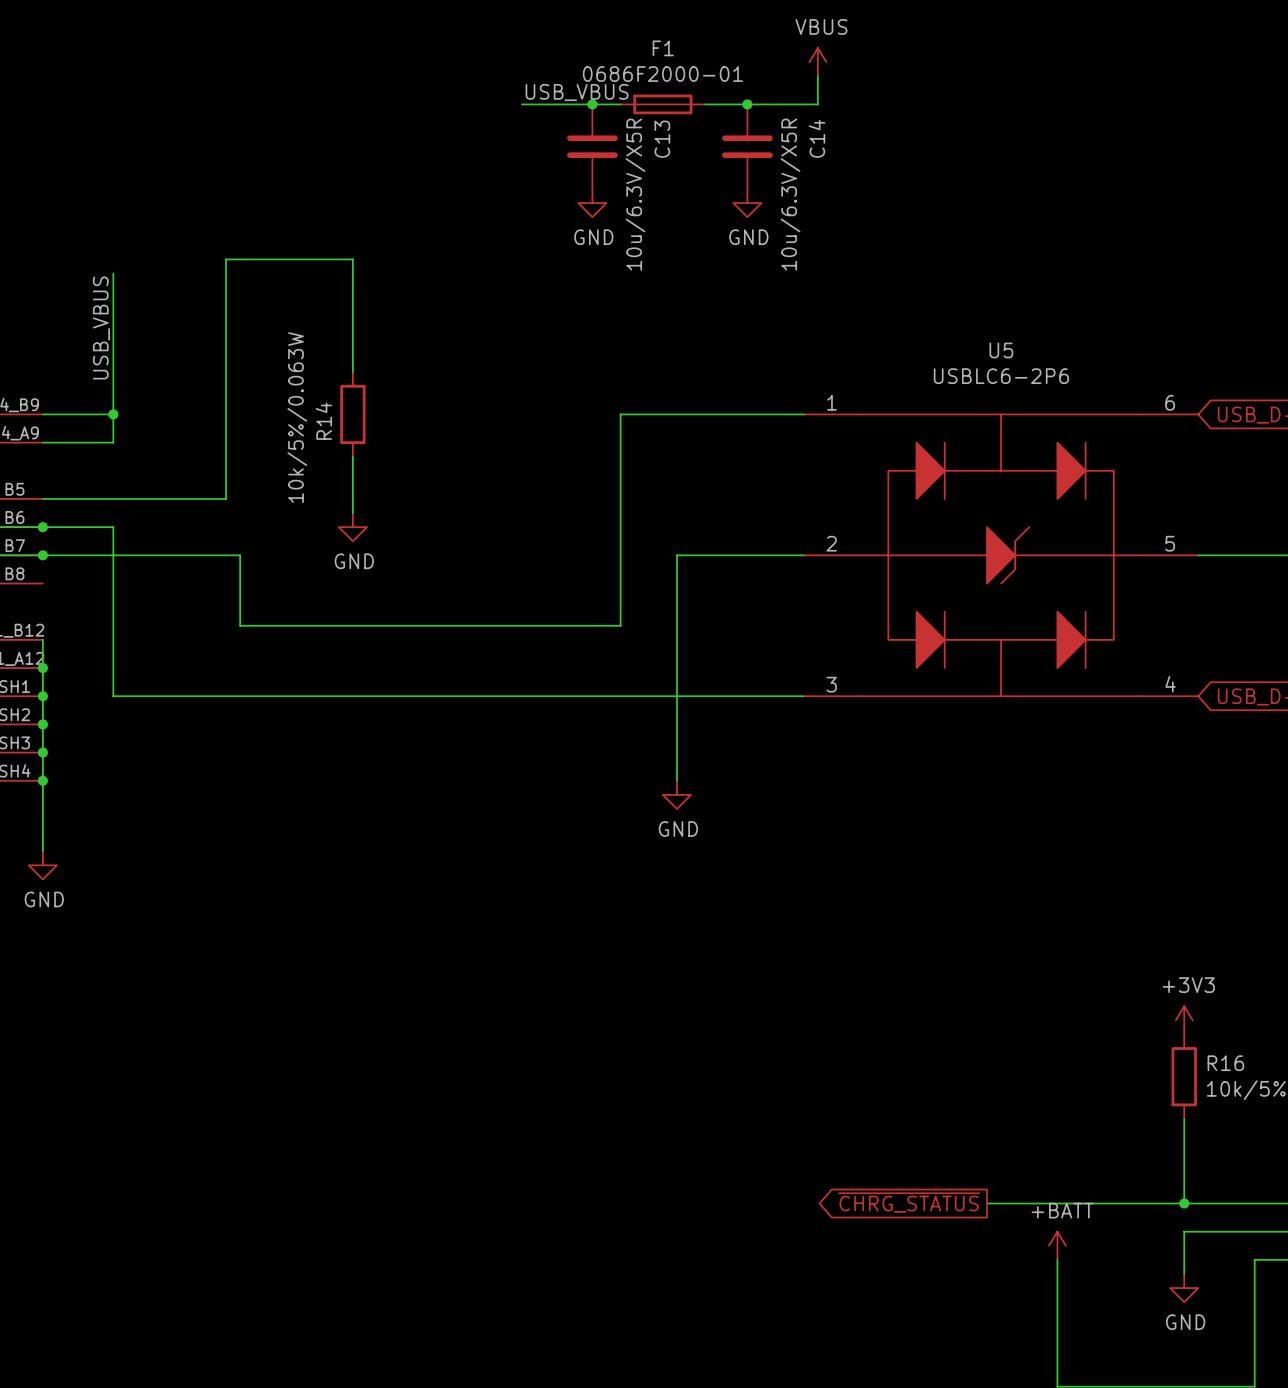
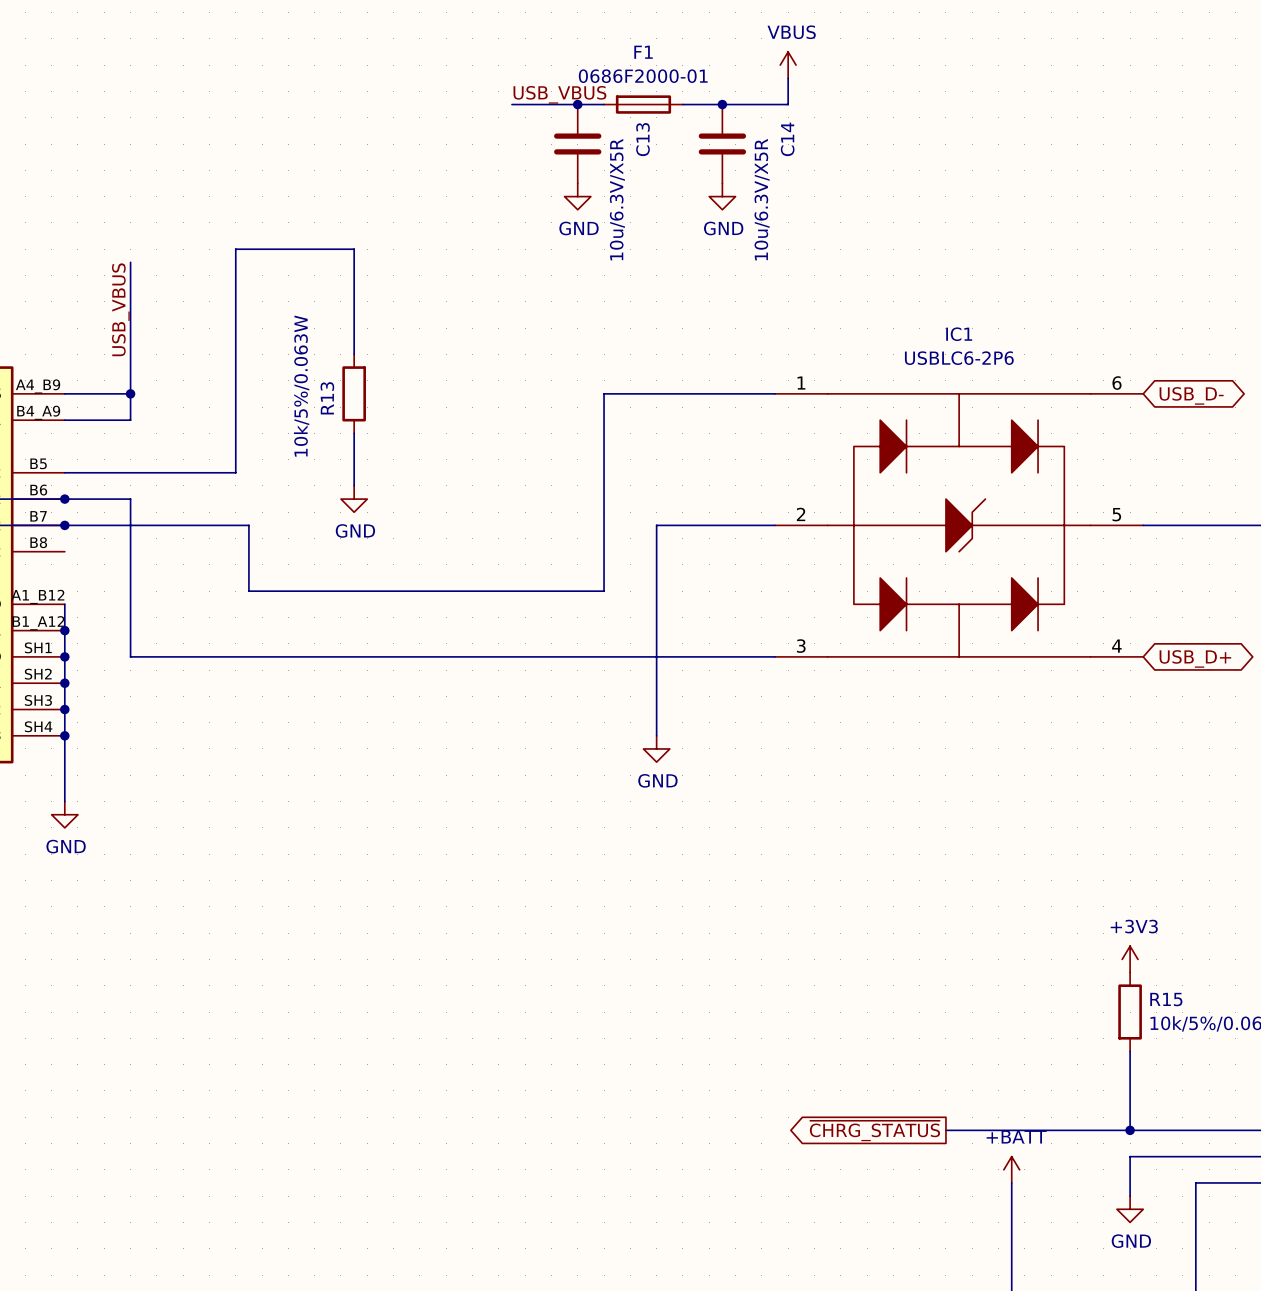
U5 name: U5 (1001, 350) -> IC1 (959, 334)
R14 name: R14 (323, 421) -> R13 (327, 398)
R16 name: R16 (1225, 1063) -> R15 (1166, 999)

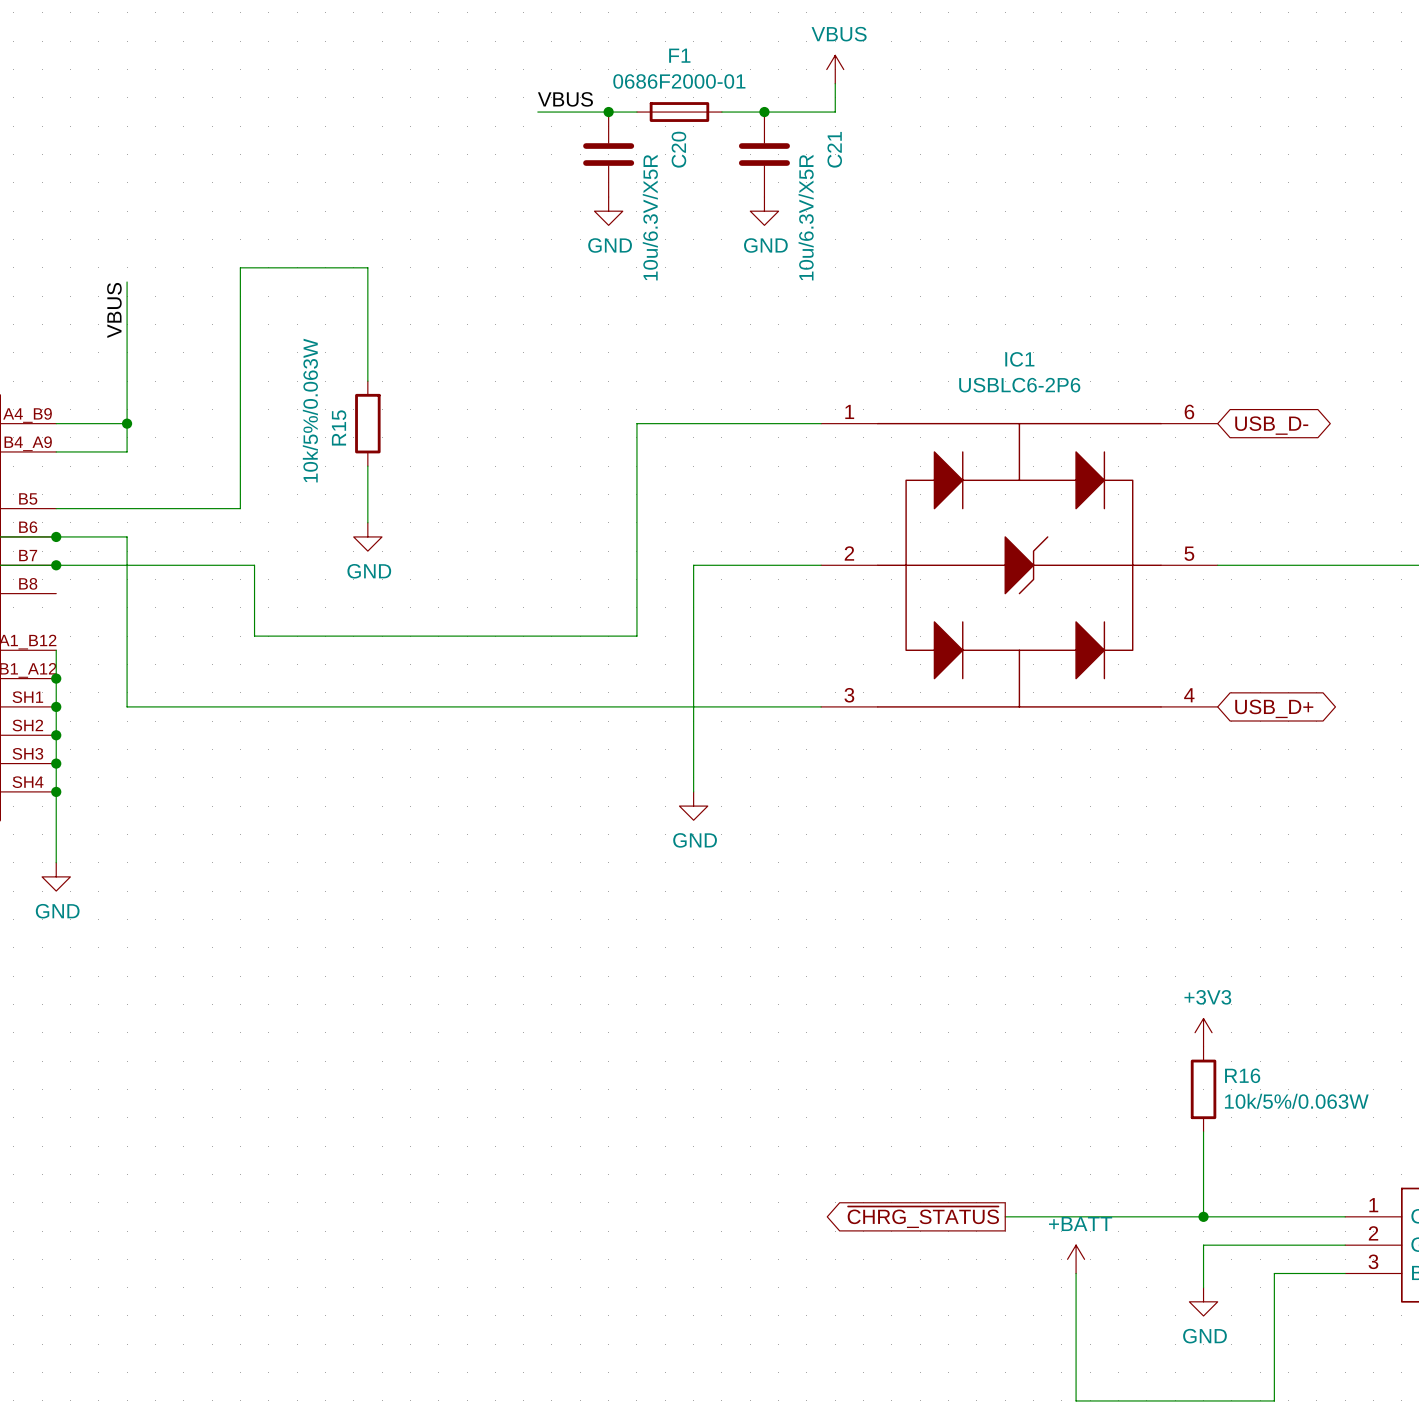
label: USB_VBUS (559, 94) -> VBUS (565, 99)
C13 name: C13 (643, 139) -> C20 (678, 149)
C14 name: C14 (787, 139) -> C21 (834, 149)
label: USB_VBUS (120, 309) -> VBUS (114, 310)
R13 name: R13 (327, 398) -> R15 (339, 427)
R15 name: R15 (1166, 999) -> R16 (1242, 1075)

